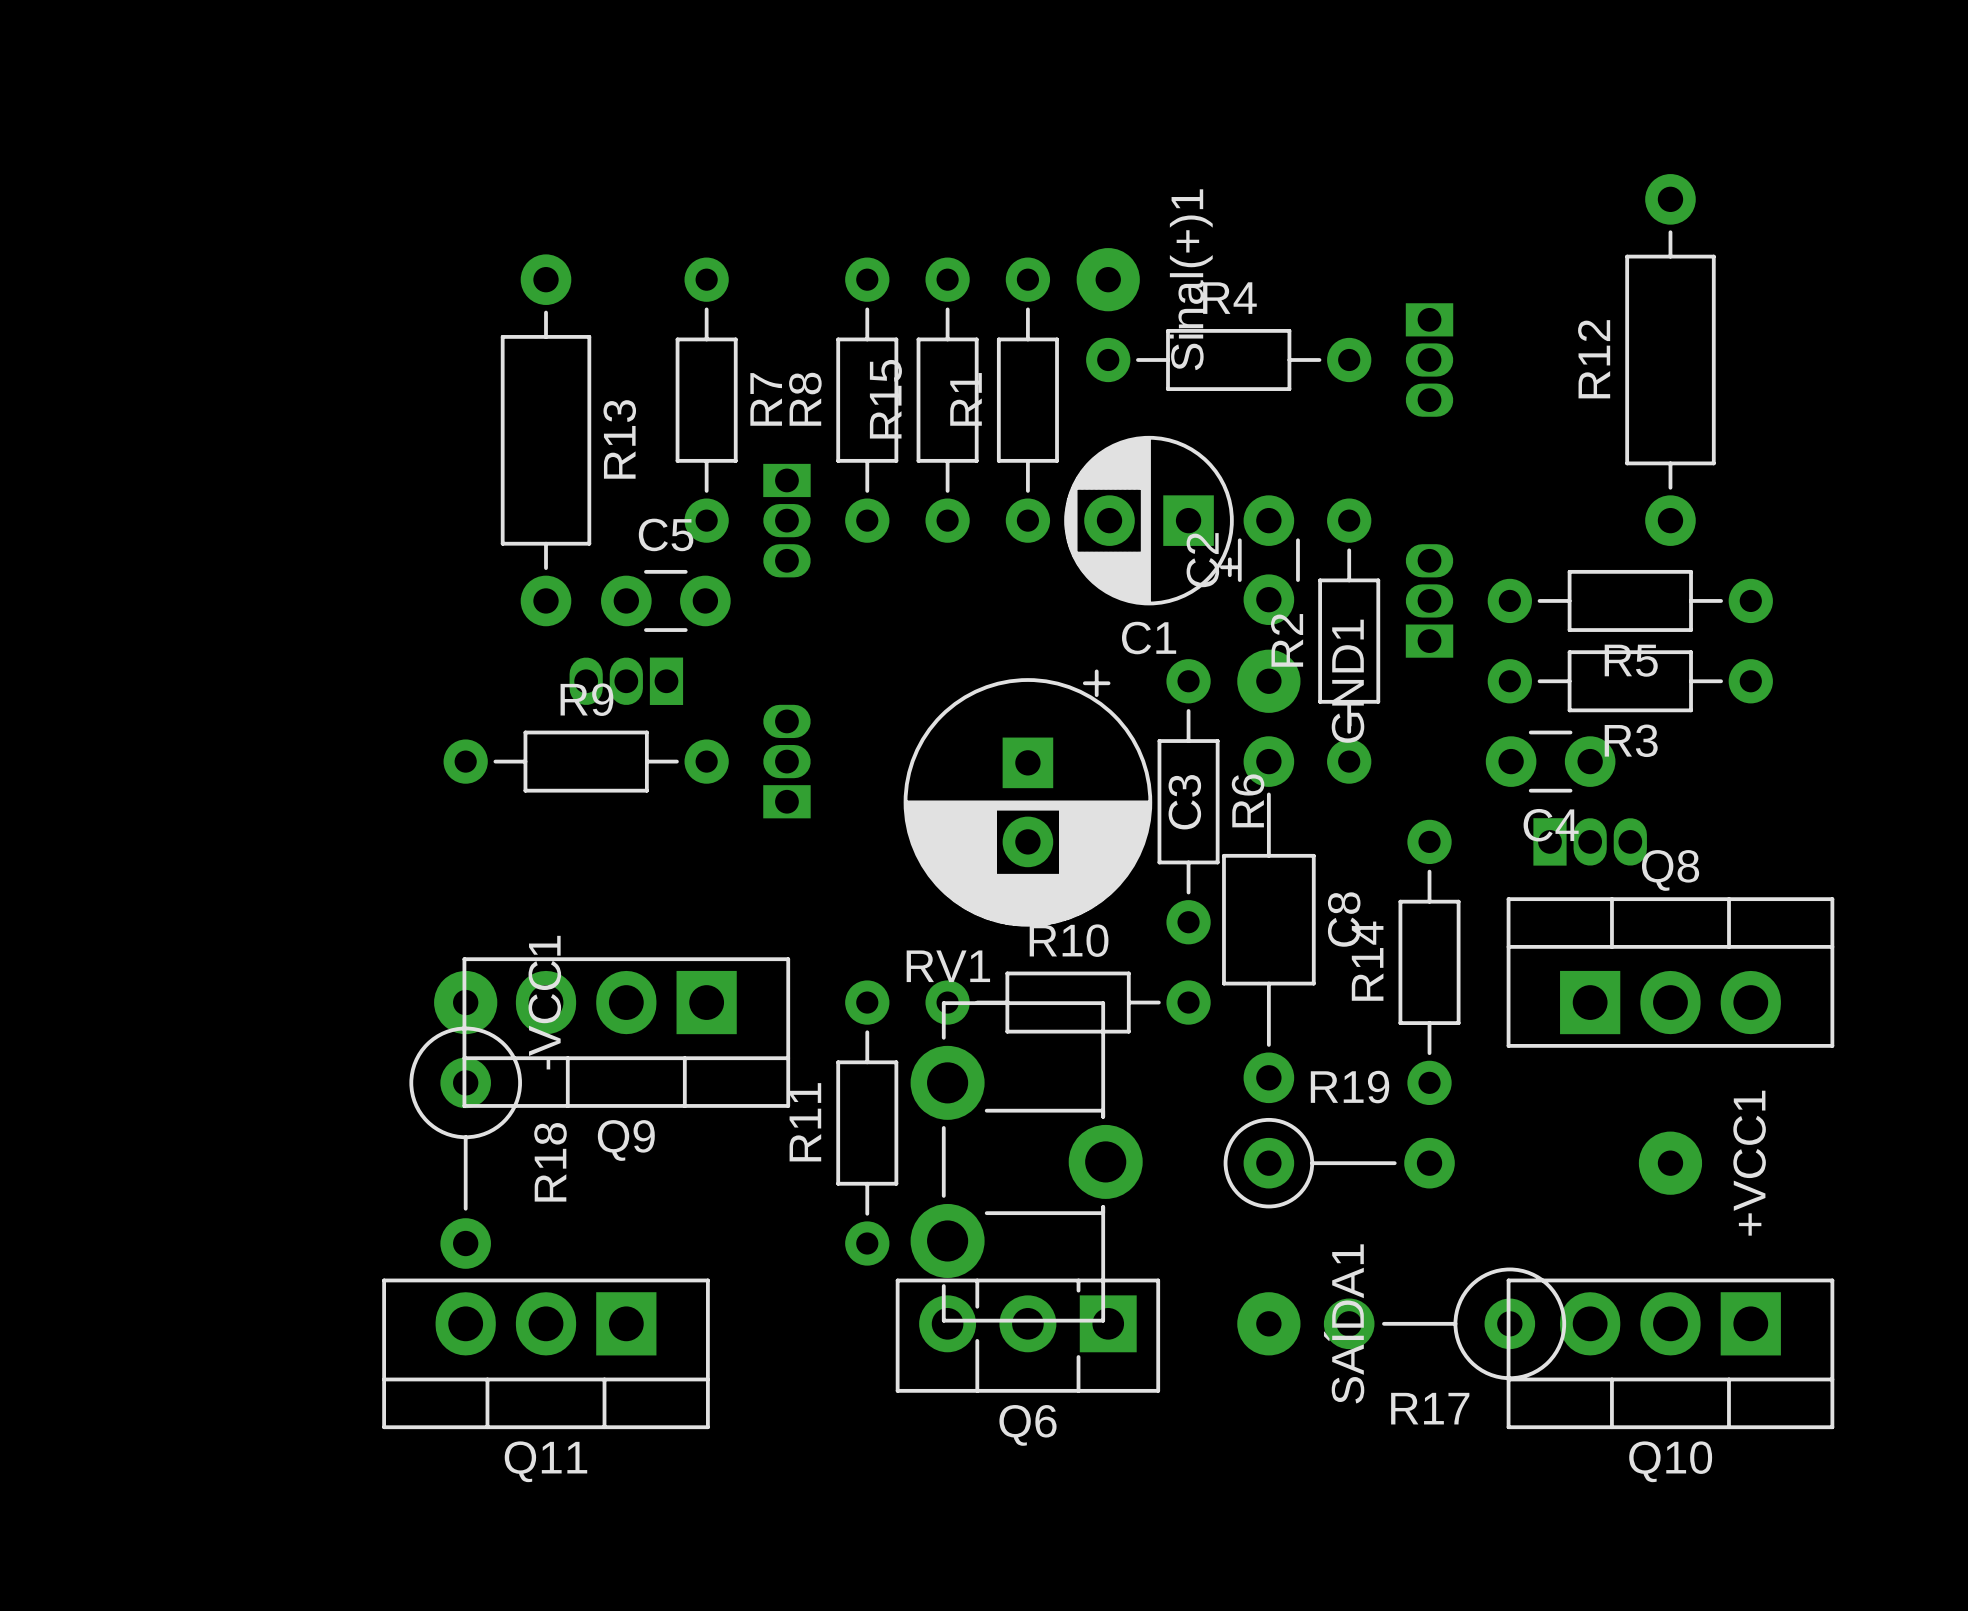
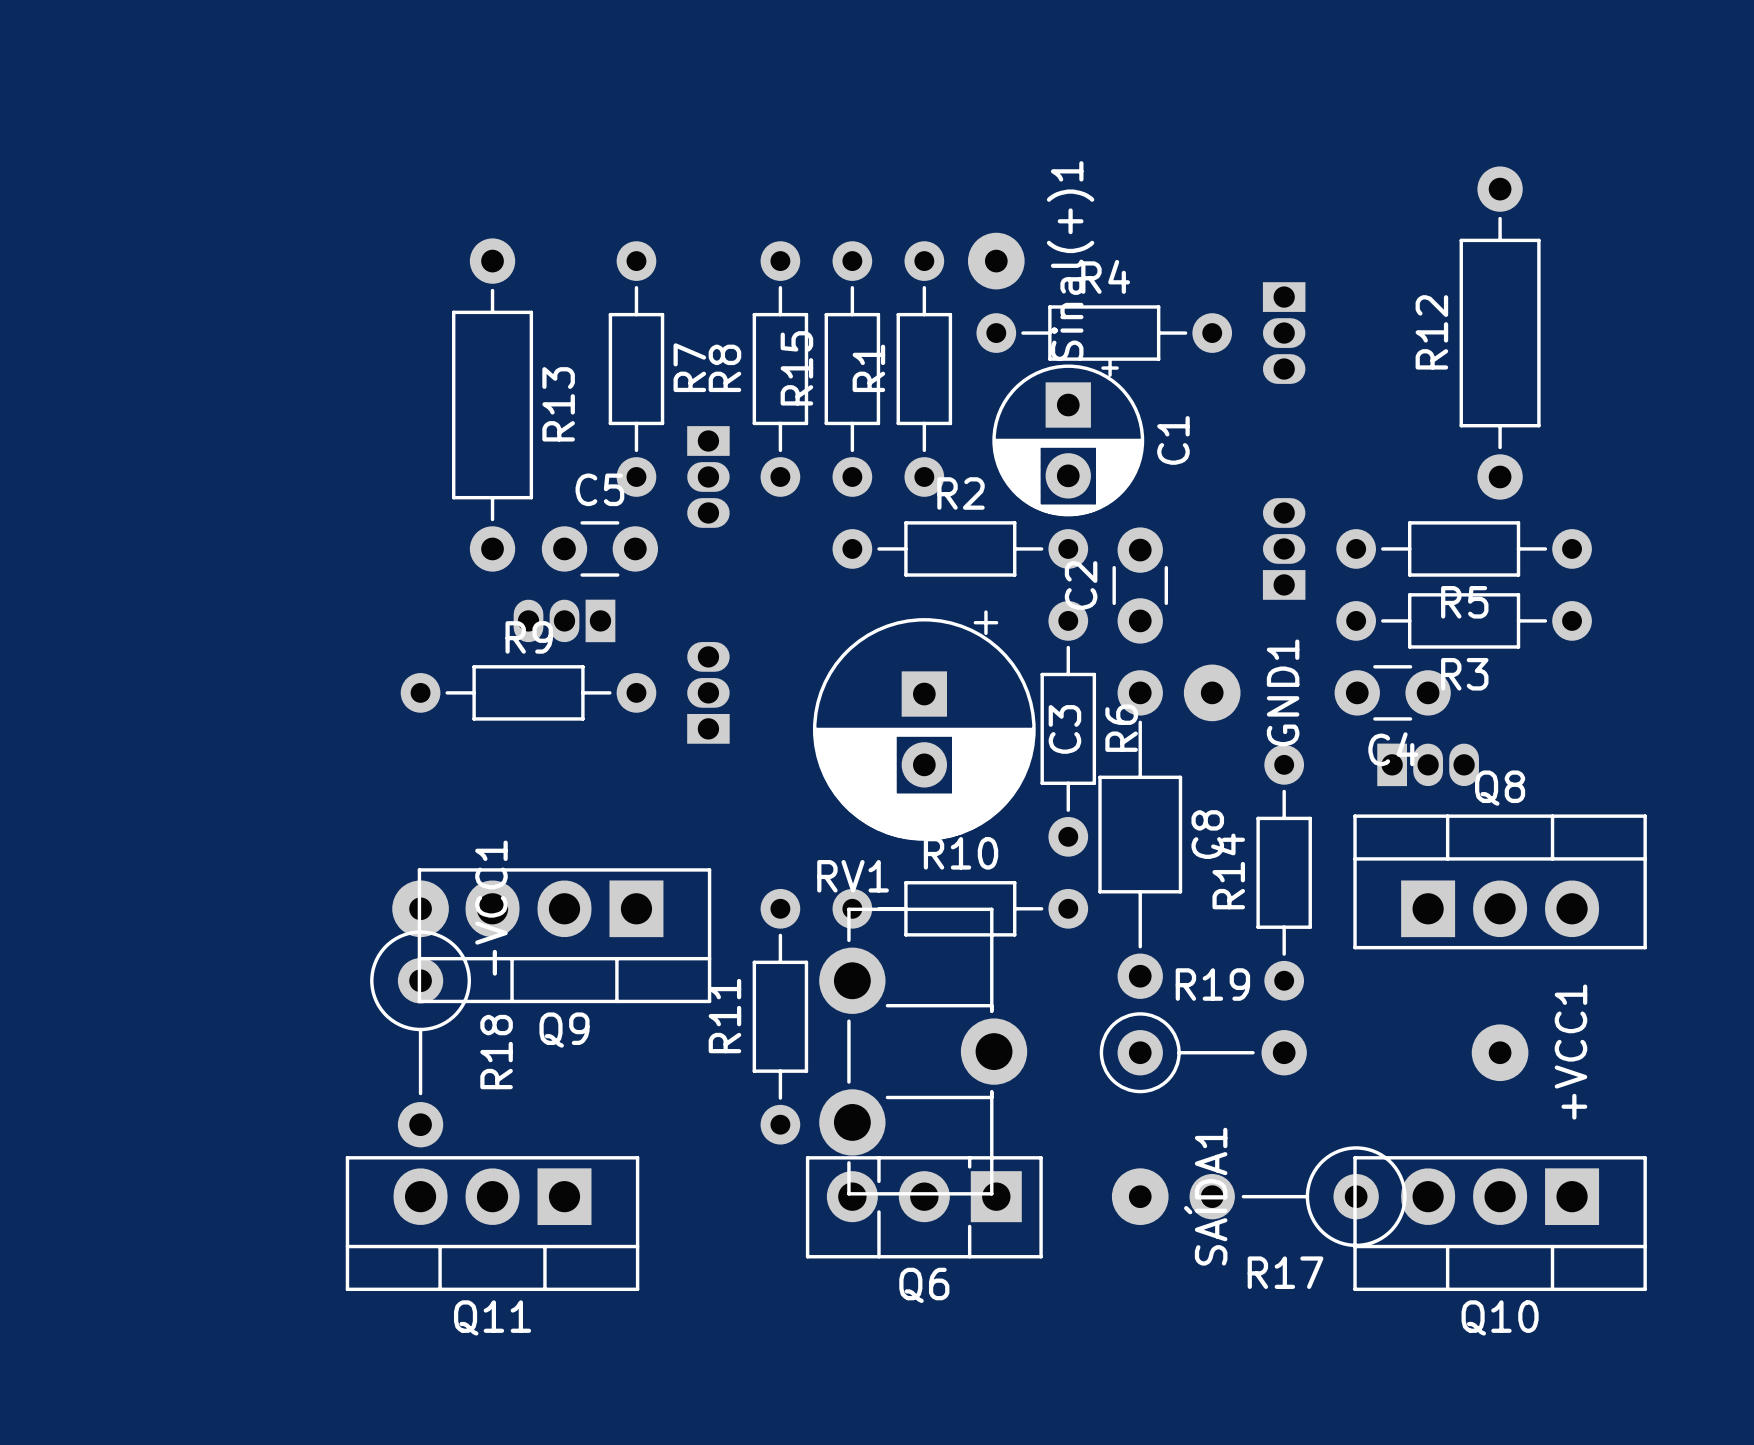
C1 rotation: 0° (1151, 520) -> 90° counterclockwise (1068, 437)
C2 position: (1268, 560) -> (1140, 585)
R2 rotation: 0° (1349, 641) -> 90° clockwise (960, 548)
R2 position: (1349, 641) -> (960, 548)
GND1 position: (1268, 681) -> (1212, 692)

